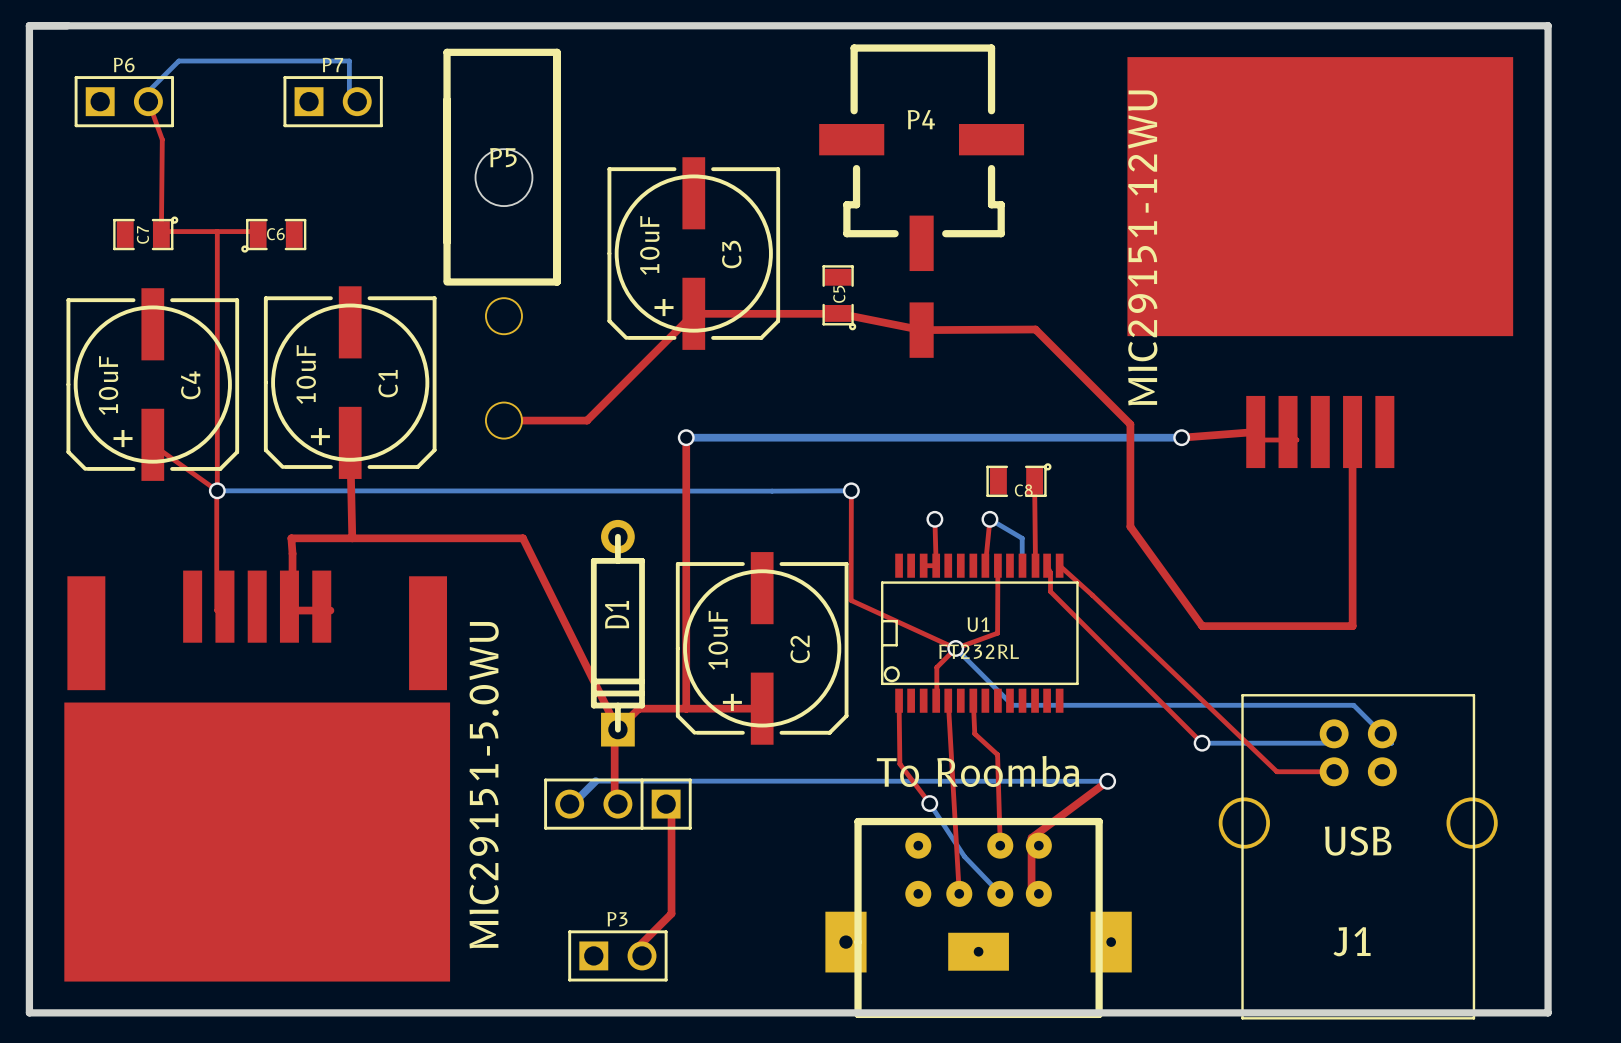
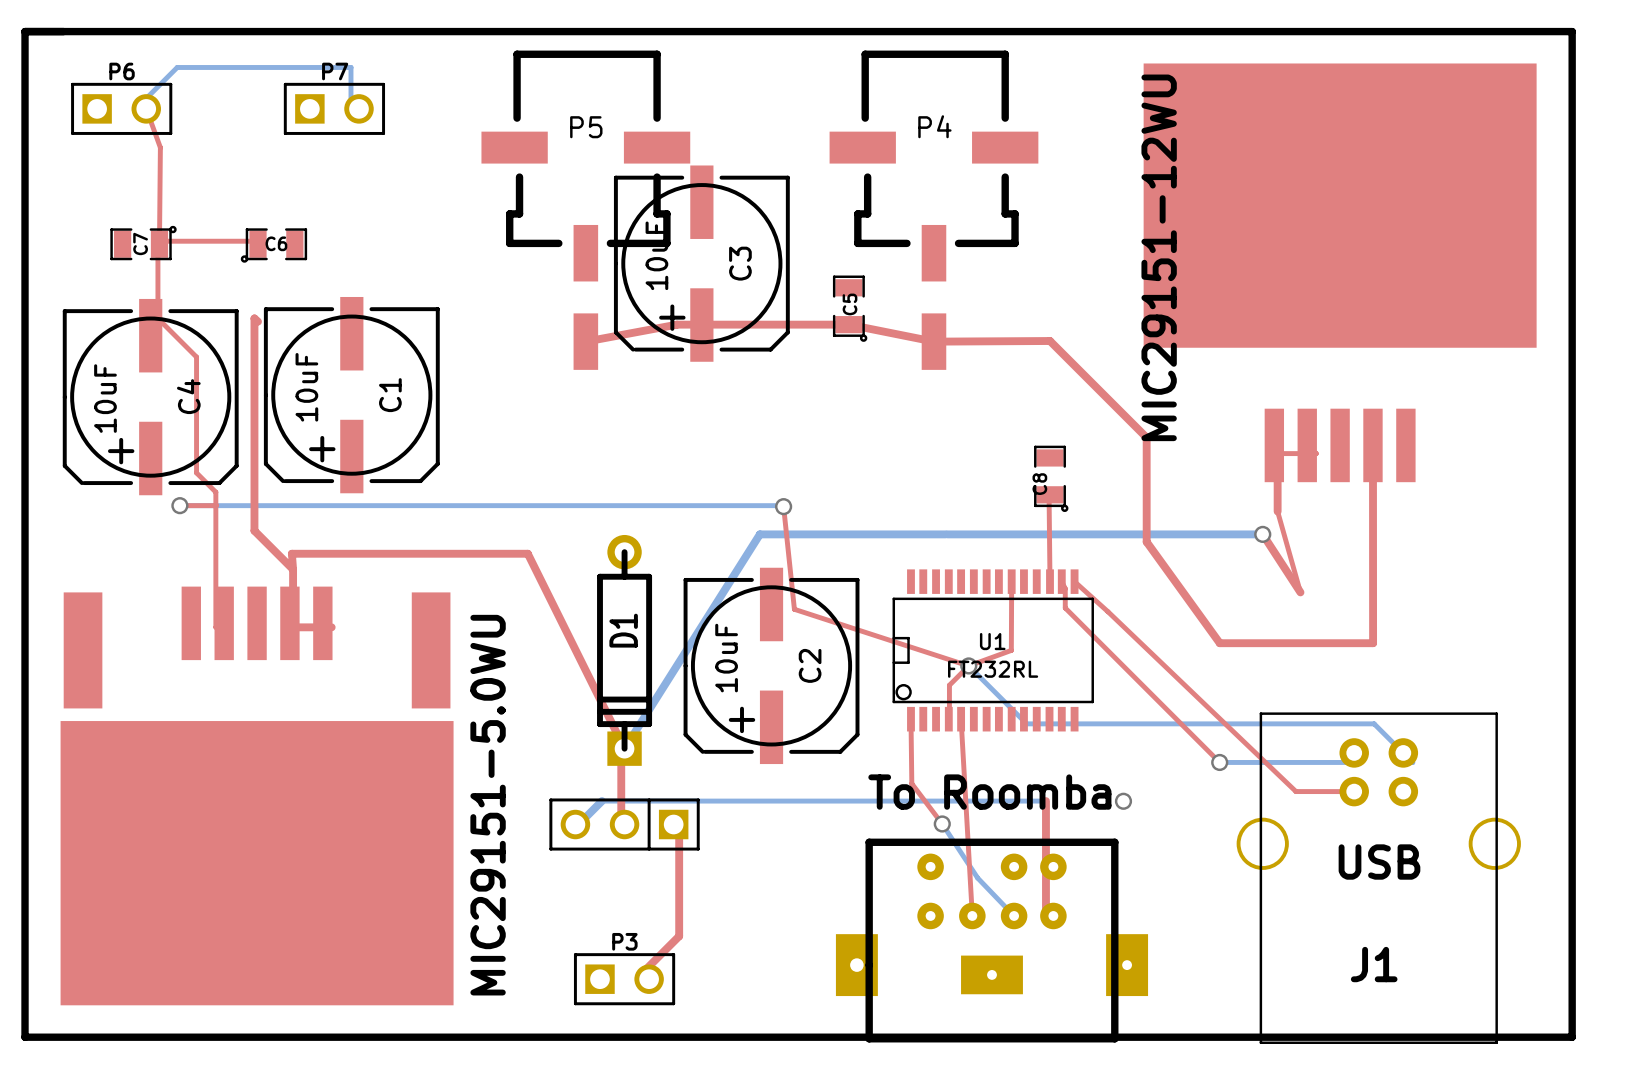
P5 footprint: [443, 48, 561, 440] -> [481, 50, 691, 370]
top track: none -> (157, 241) (157, 318) (196, 357) (196, 472) (215, 492) (215, 505) (179, 505)
top track: (217, 231) (217, 490) (152, 444) -> none
top track: none -> (258, 321) (254, 318) (254, 530) (293, 569)
top track: (838, 313) (693, 313) (587, 420) (503, 420) -> (848, 324) (676, 324) (585, 341)
top track: (1255, 432) (1181, 437) -> none
top track: (686, 437) (686, 708) -> none
bottom track: (686, 437) (1181, 437) -> none
via: (686, 437) -> none
via position: (1181, 437) -> (1262, 534)
top track: none -> (1277, 453) (1277, 511) (1300, 592) (1262, 534)
top track: (350, 442) (352, 538) -> none
C8 rotation: 0° (1018, 480) -> 90° clockwise (1051, 478)
bottom track: (217, 490) (851, 490) -> none
via position: (217, 490) -> (179, 505)
top track: (851, 490) (851, 600) (955, 648) -> (783, 506) (794, 609) (968, 665)
via: (851, 490) -> none
bottom track: none -> (179, 505) (783, 506)
via: none -> (783, 506)
bottom track: none -> (945, 534) (759, 534) (624, 748)
top track: (934, 519) (936, 565) (923, 565) -> none
bottom track: none -> (947, 534) (1262, 534)
via: (934, 519) -> none
top track: (989, 519) (985, 565) -> none
bottom track: (989, 519) (1022, 538) (1022, 561) -> none
via: (989, 519) -> none
top track: (973, 700) (974, 733) (997, 754) (1000, 845) -> none
top track: (762, 708) (638, 708) (617, 729) -> none
bottom track: (595, 781) (1107, 781) -> (601, 801) (1045, 801)
top track: (1107, 781) (1031, 837) -> (1045, 801) (1045, 858)

